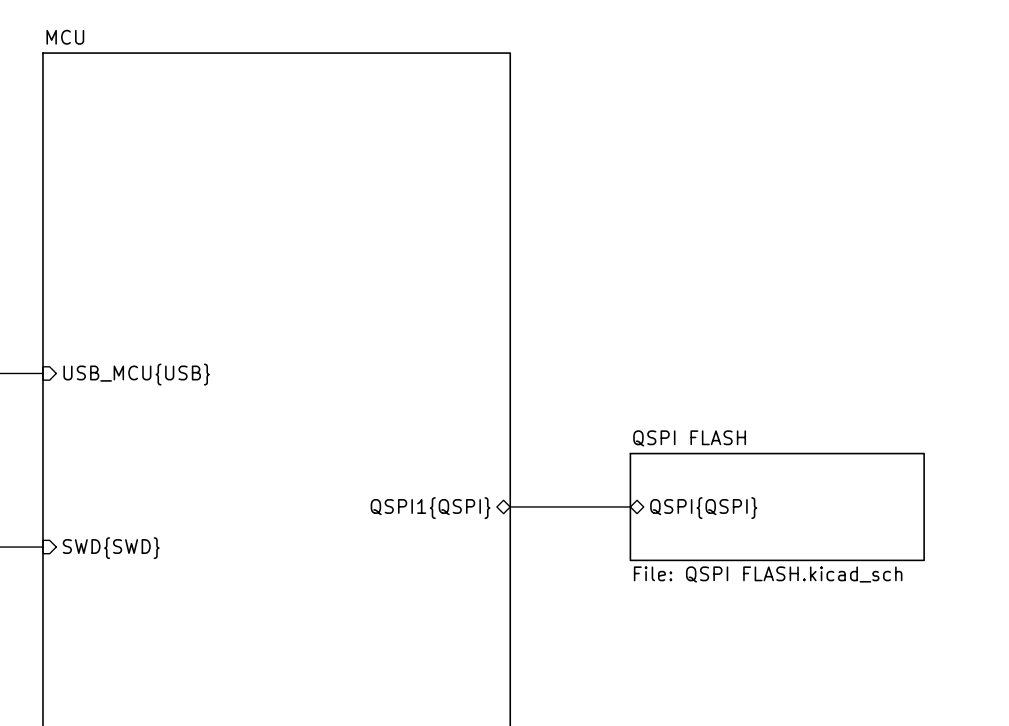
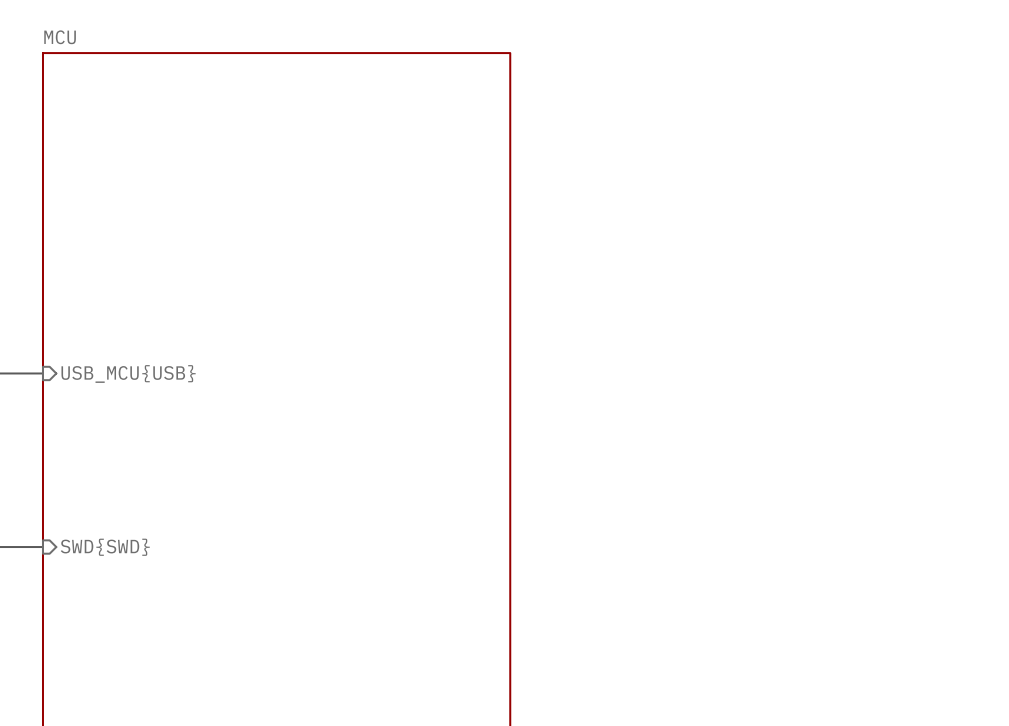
bus: (510, 506) (630, 506) -> none
sheet QSPI FLASH: File: QSPI FLASH.kicad_sch (777, 506) -> none
sheet pin: QSPI1{QSPI} (430, 508) -> none
sheet pin: QSPI{QSPI} (703, 508) -> none

